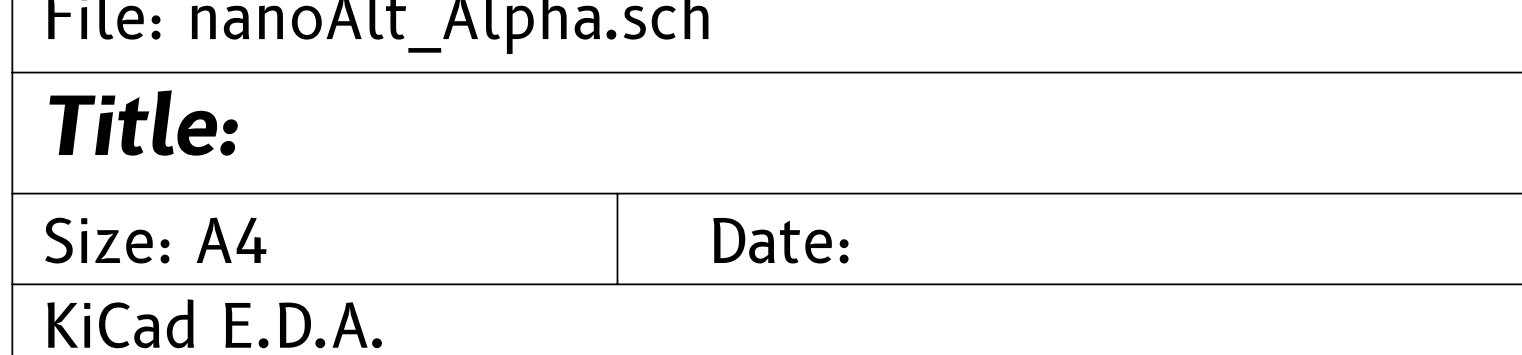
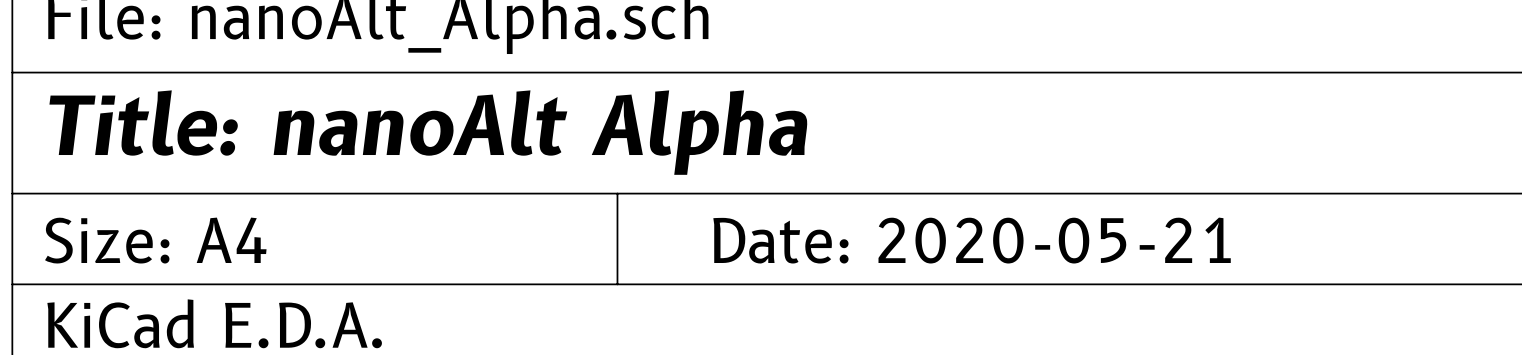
title block: Title: (143, 123) -> Title: nanoAlt Alpha (428, 132)
title block: Date: (780, 240) -> Date: 2020-05-21 (972, 240)

